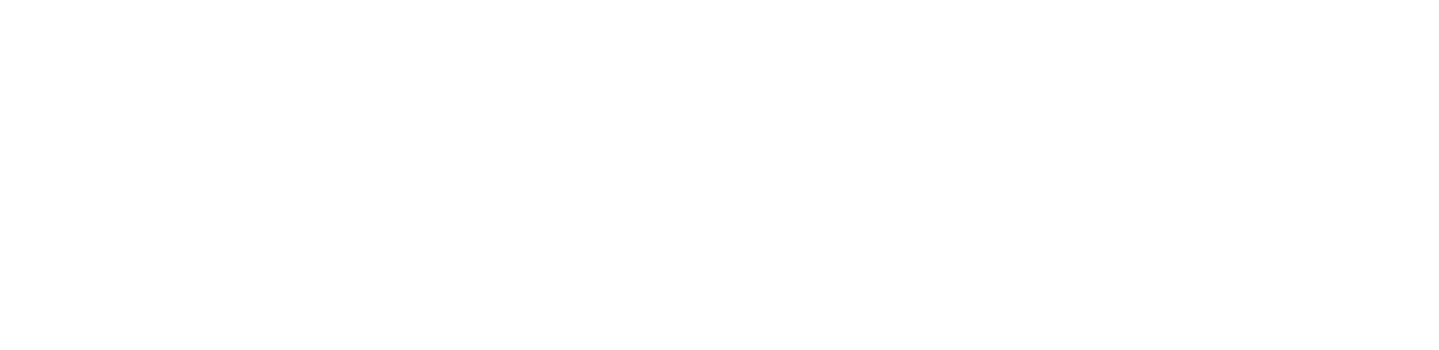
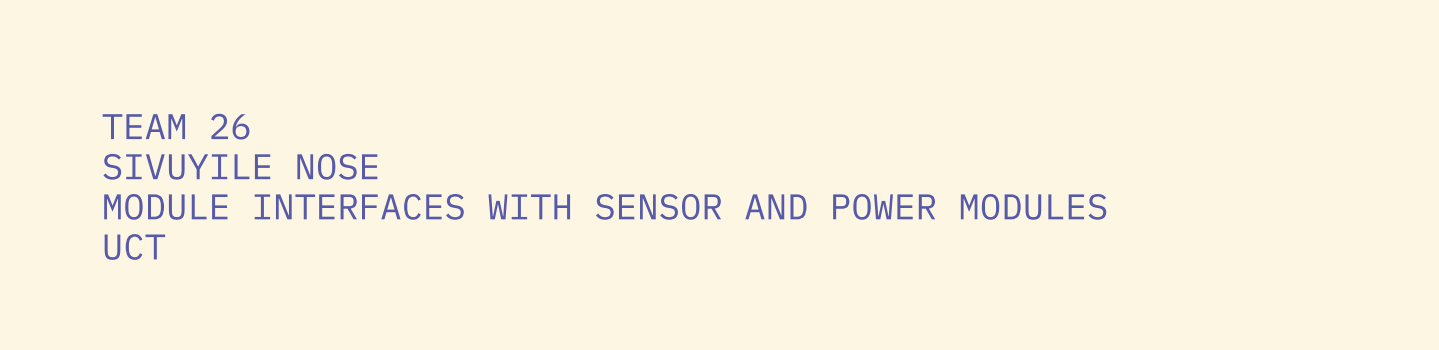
text: none -> TEAM 26 (176, 126)
text: none -> SIVUYILE NOSE (240, 166)
text: none -> MODULE INTERFACES WITH SENSOR AND POWER MODULES (605, 206)
text: none -> UCT (134, 246)

